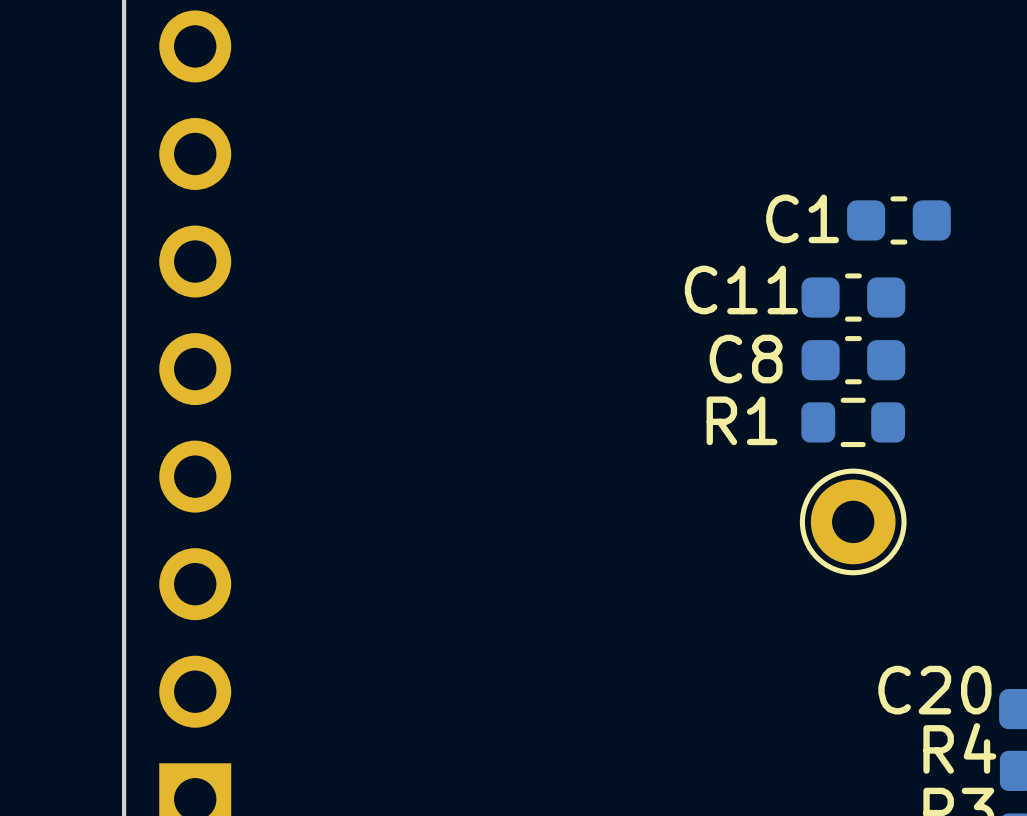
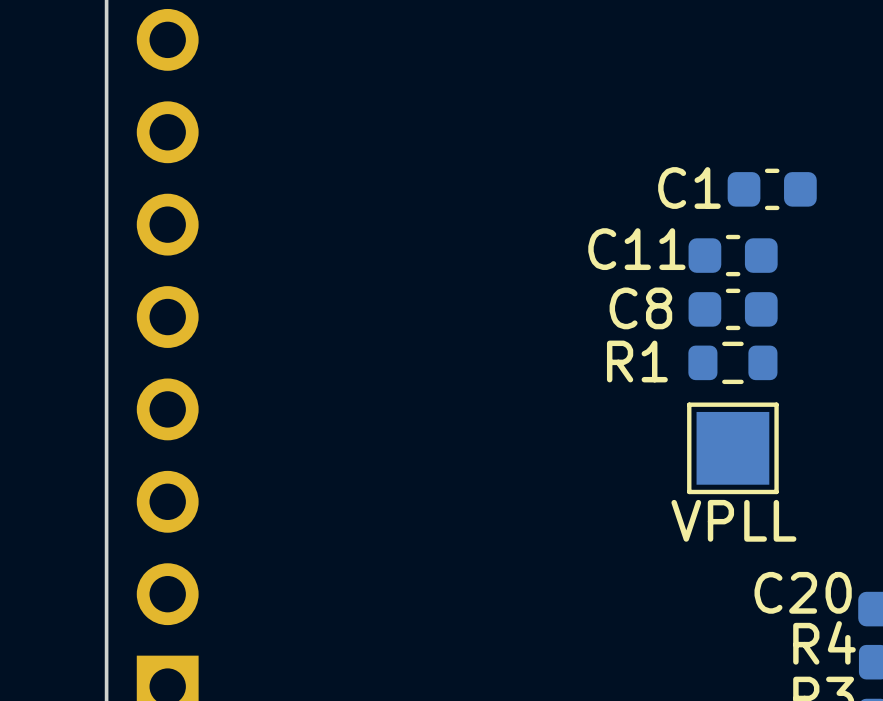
part footprint: [799, 468, 907, 576] -> [687, 402, 779, 495]
part value: none -> VPLL (733, 520)

